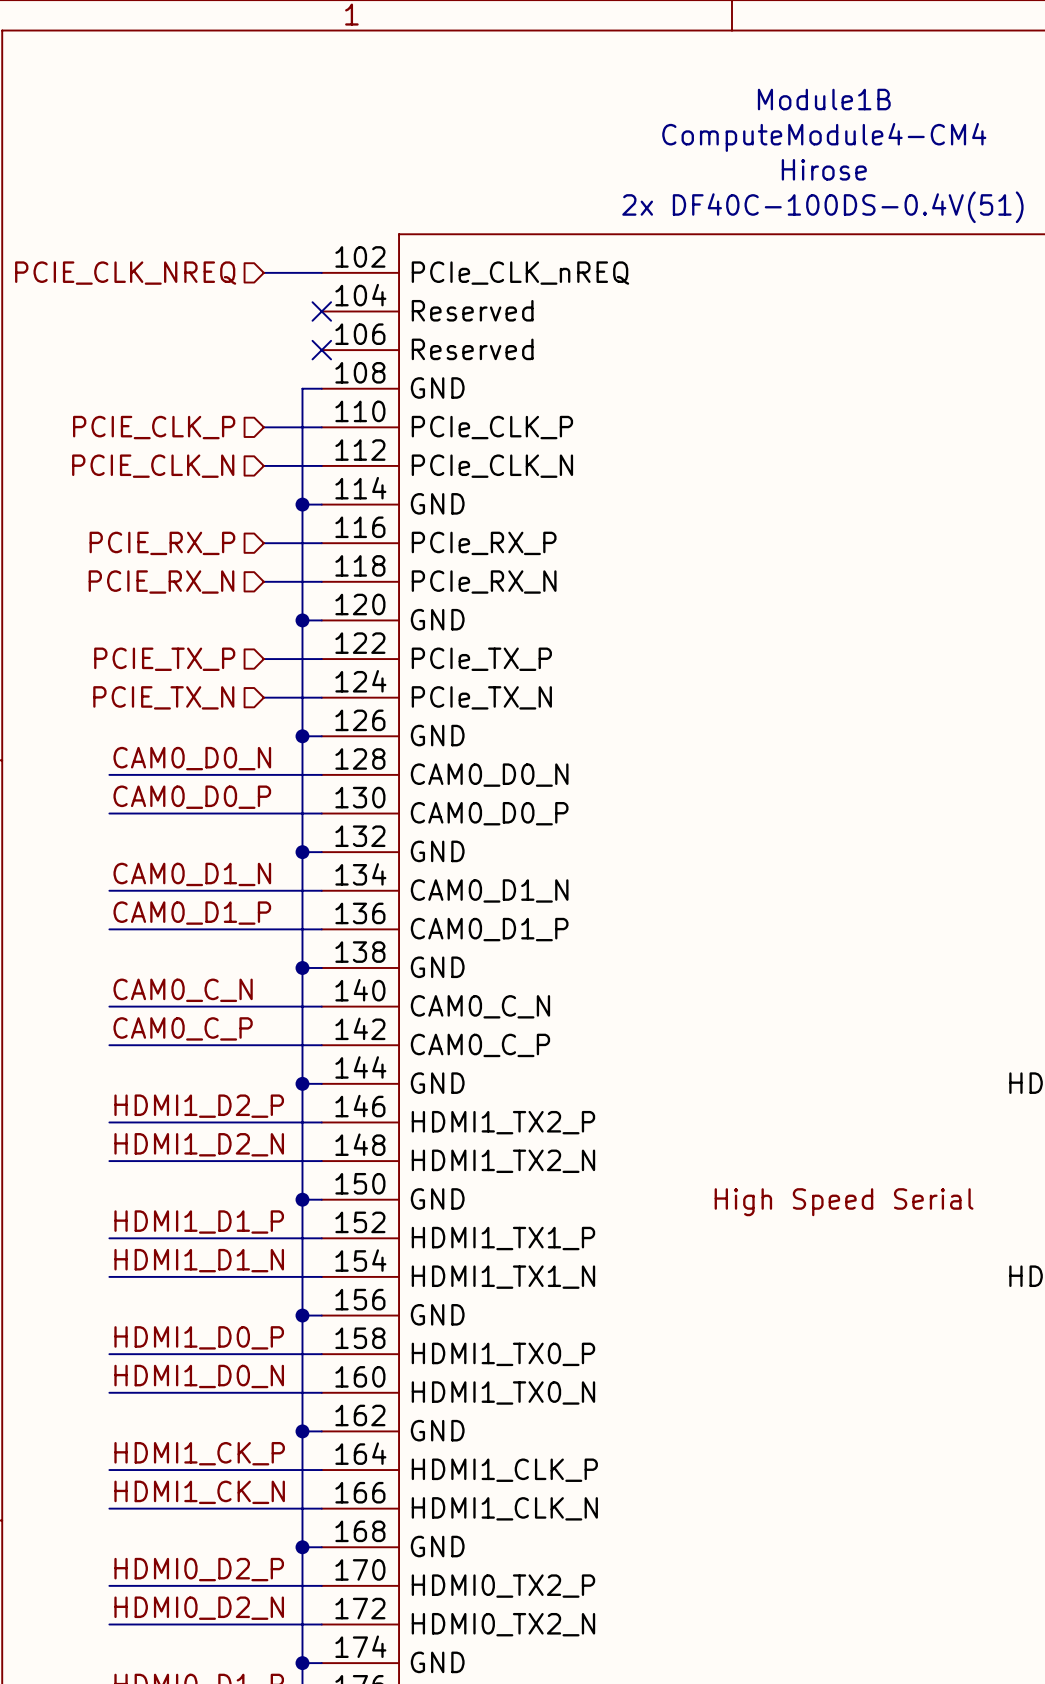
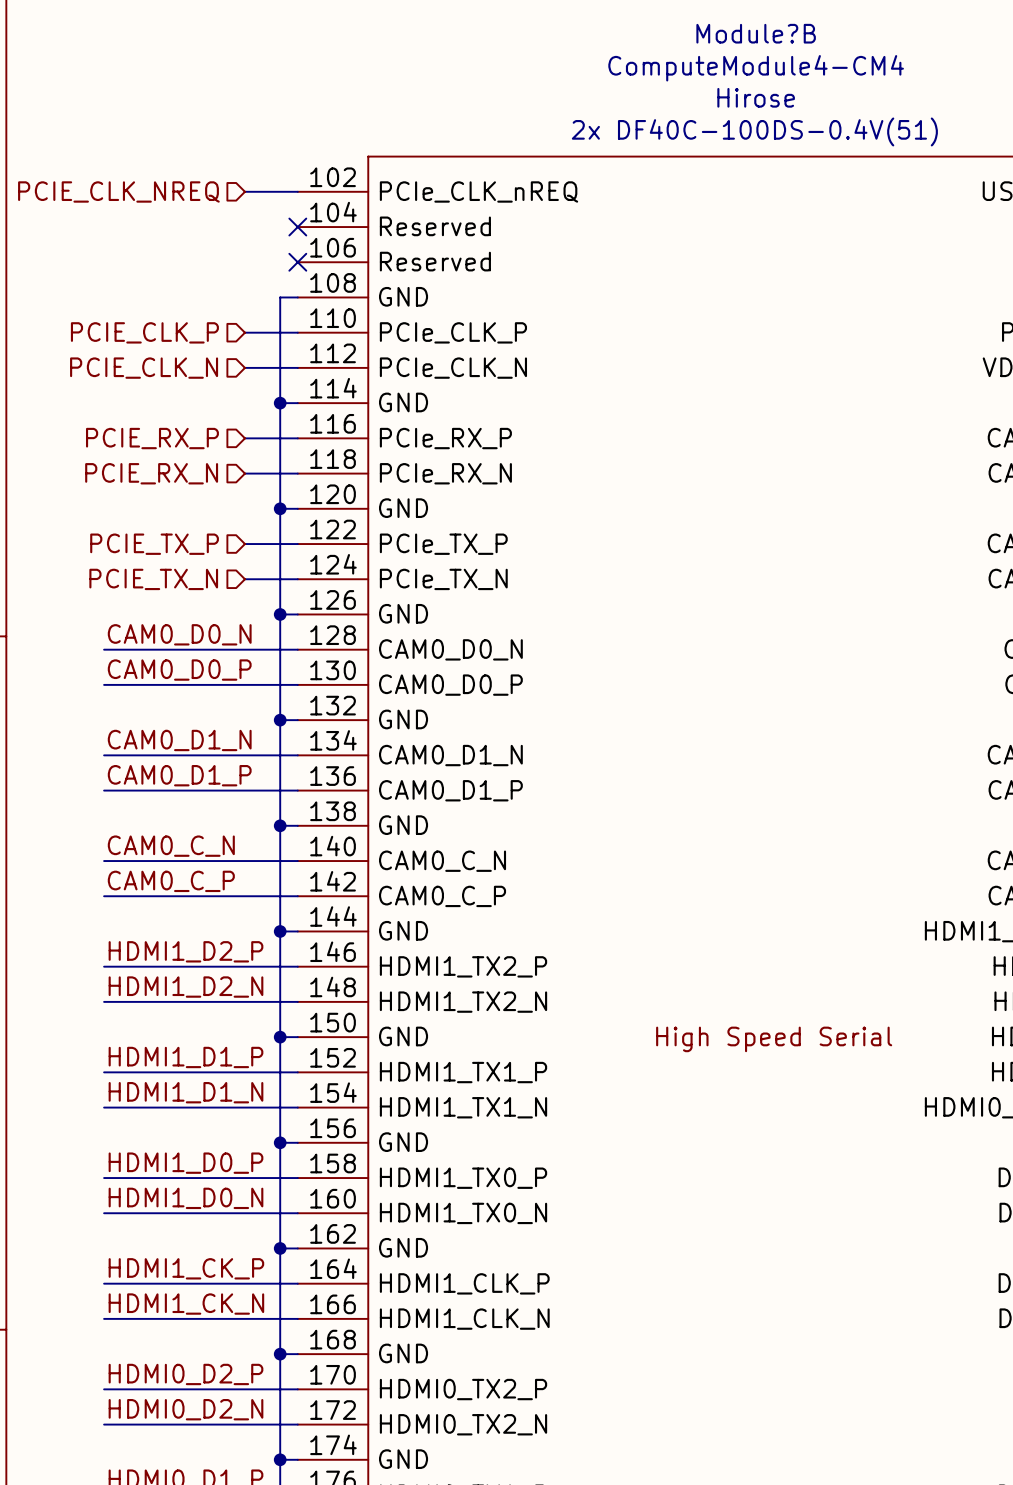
Module1B name: Module1B (824, 99) -> Module?B (756, 33)

